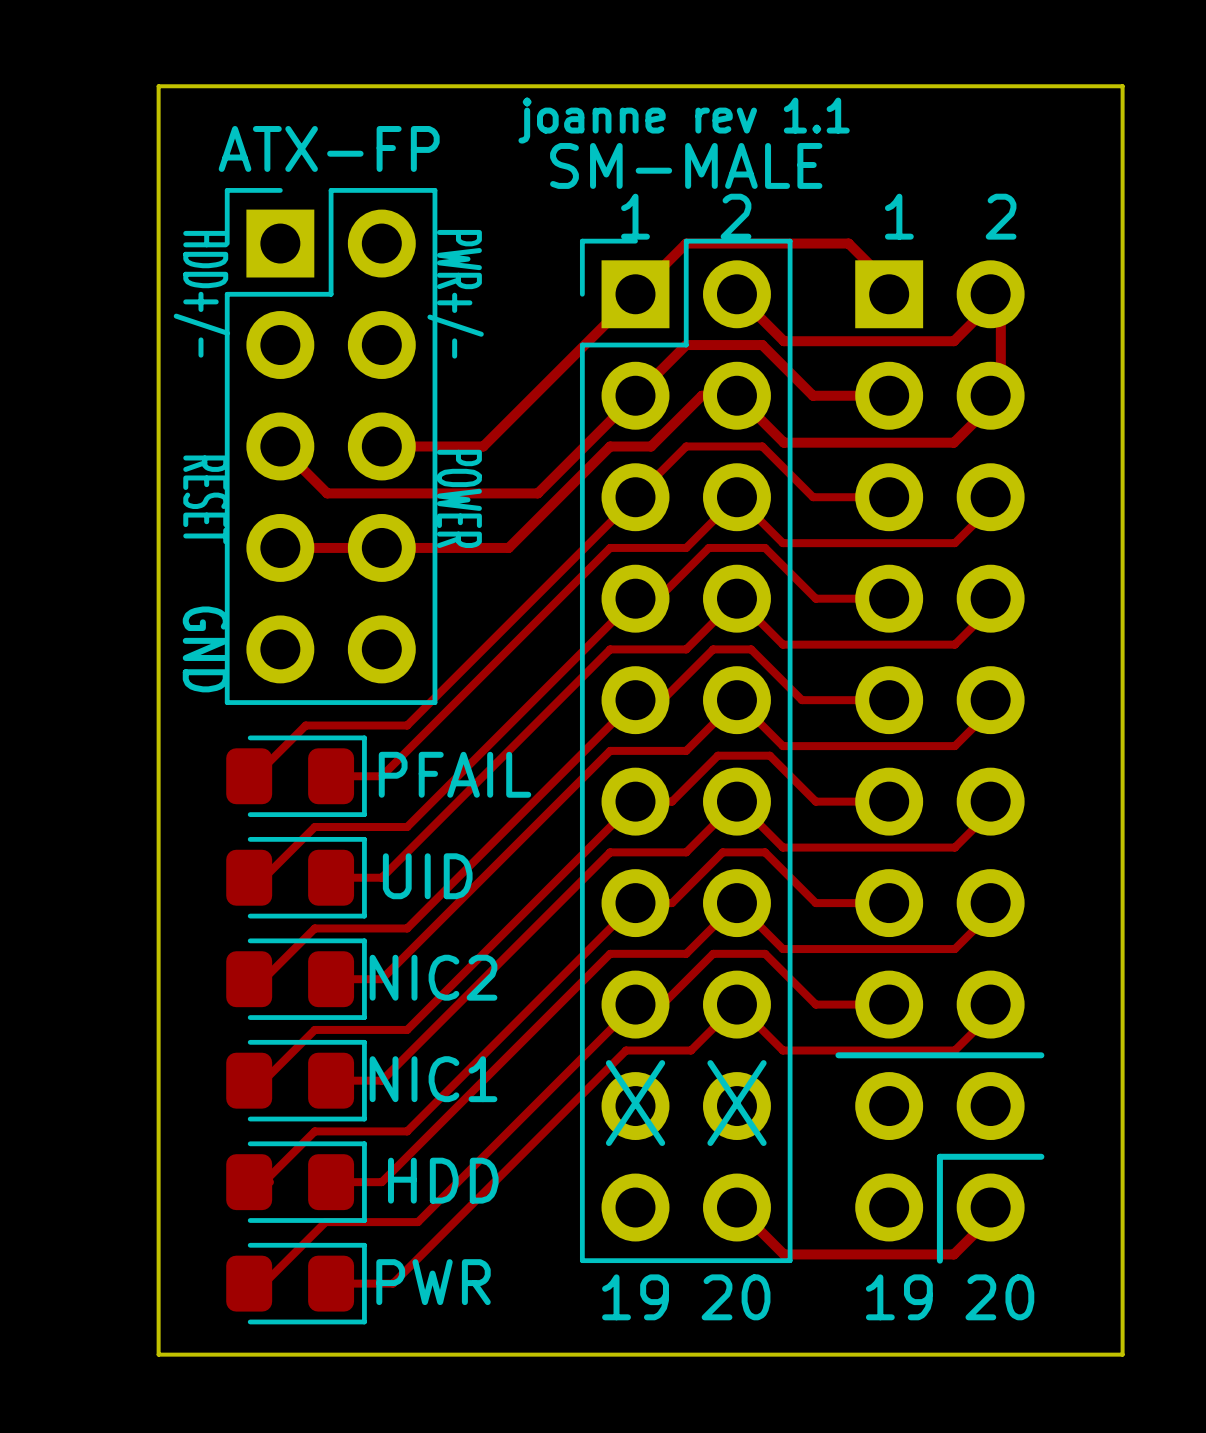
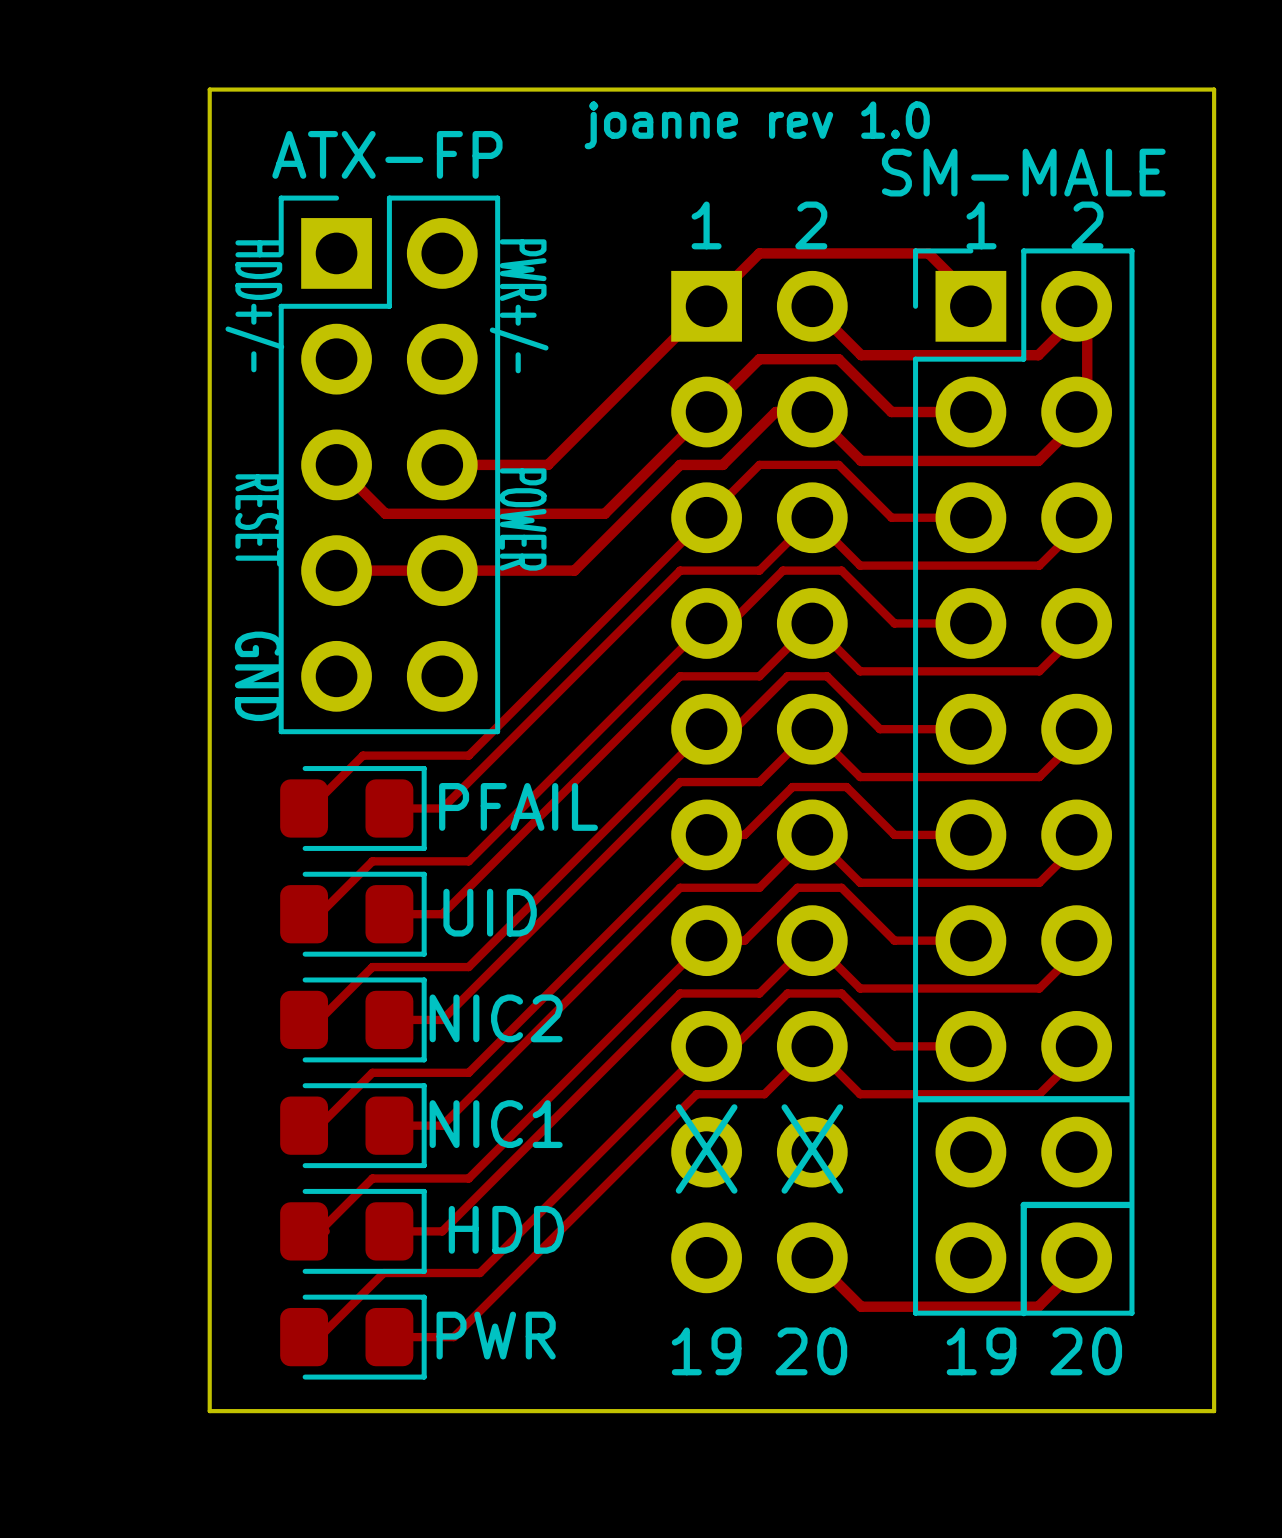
text: joanne rev 1.1 (684, 120) -> joanne rev 1.0 (757, 125)
SM-MALE position: (686, 750) -> (1023, 782)

